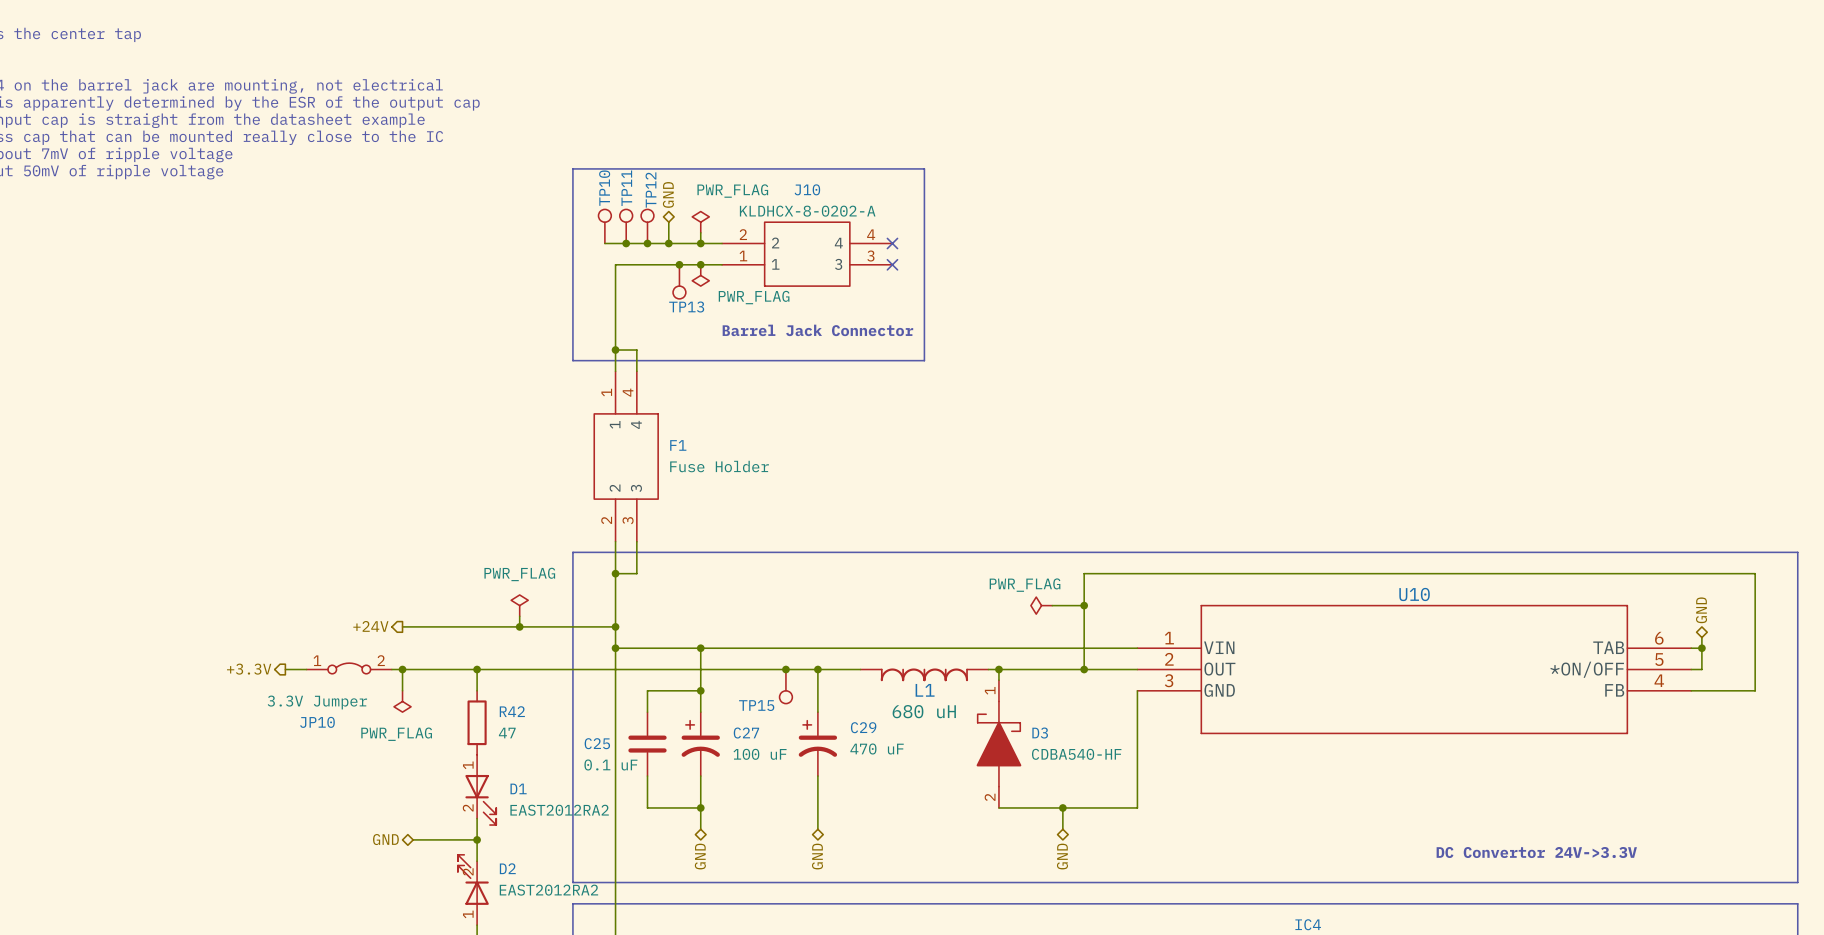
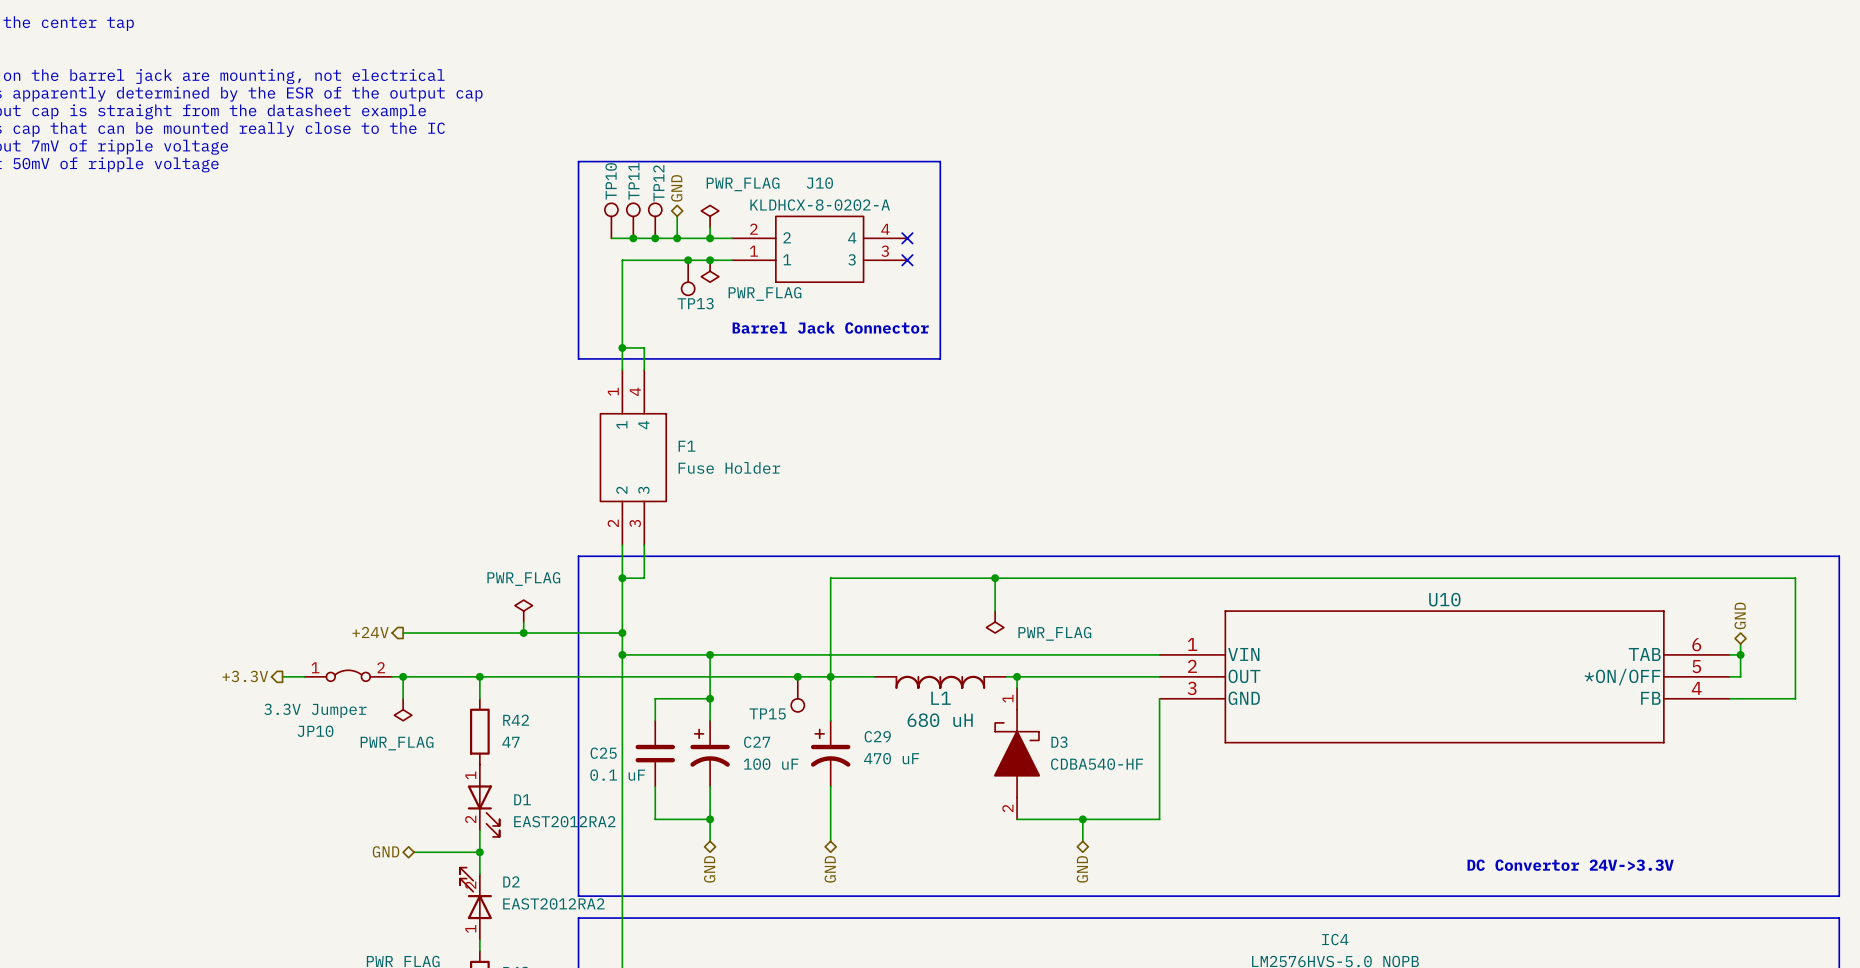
wire: none -> (995, 578) (995, 611)
junction: none -> (995, 578)
wire: (1084, 573) (1084, 669) -> (1104, 578) (830, 578) (830, 676)
power symbol text position: PWR_FLAG (1025, 585) -> PWR_FLAG (1054, 633)
power symbol rotation: 0° (1041, 605) -> 90° counterclockwise (995, 622)
power symbol position: PWR_FLAG (1041, 605) -> PWR_FLAG (995, 622)
wire: (1052, 605) (1084, 605) -> none
junction: (1084, 605) -> none
junction: (1084, 669) -> none

